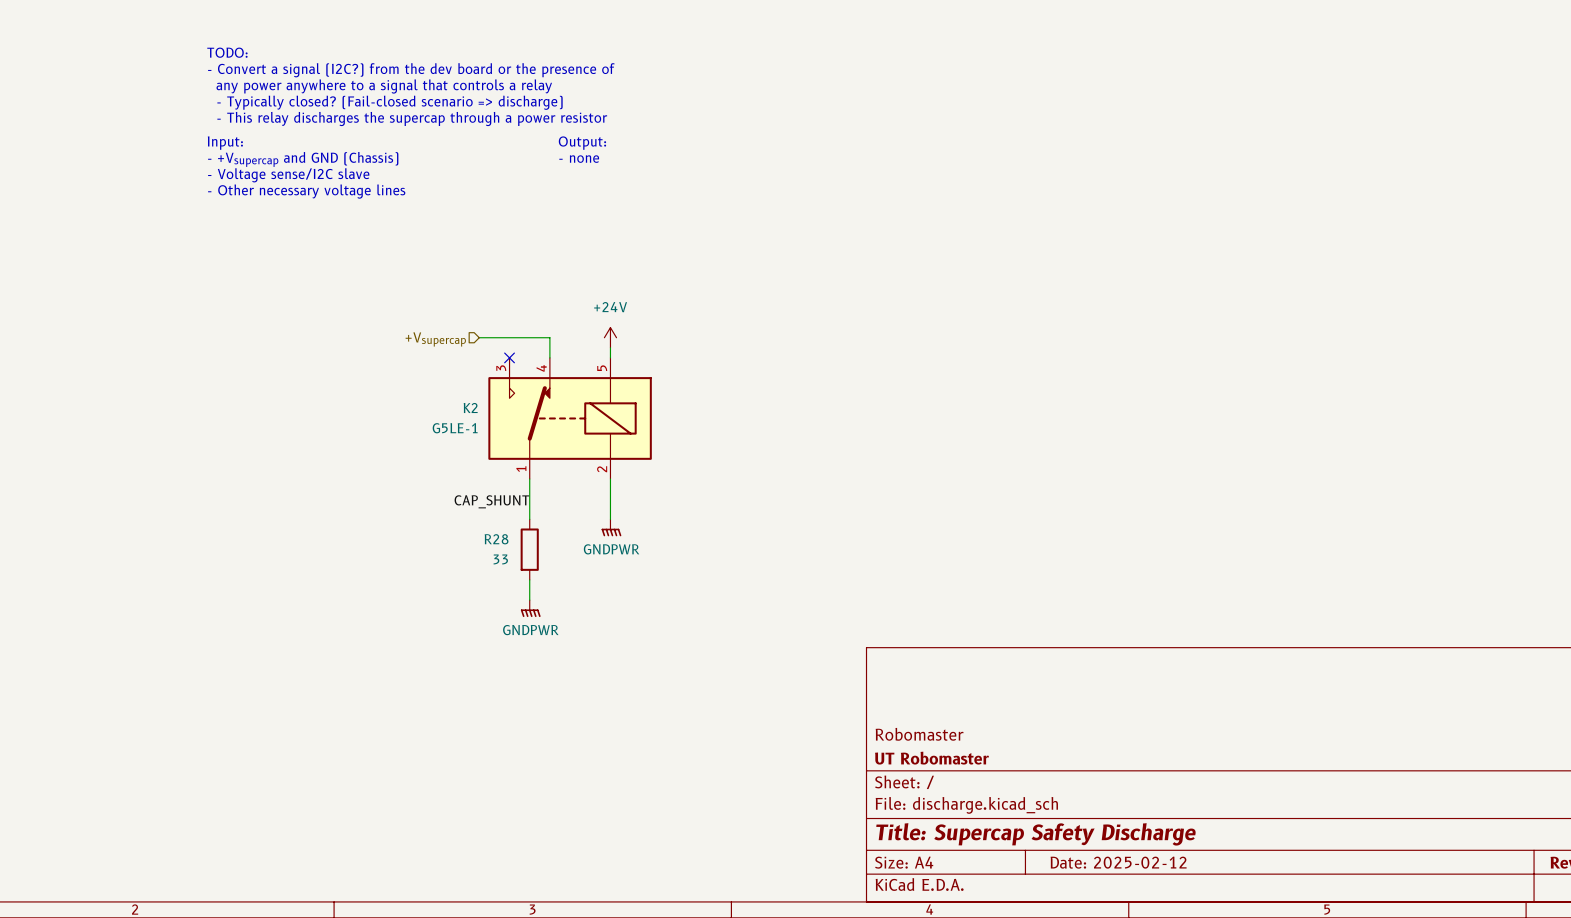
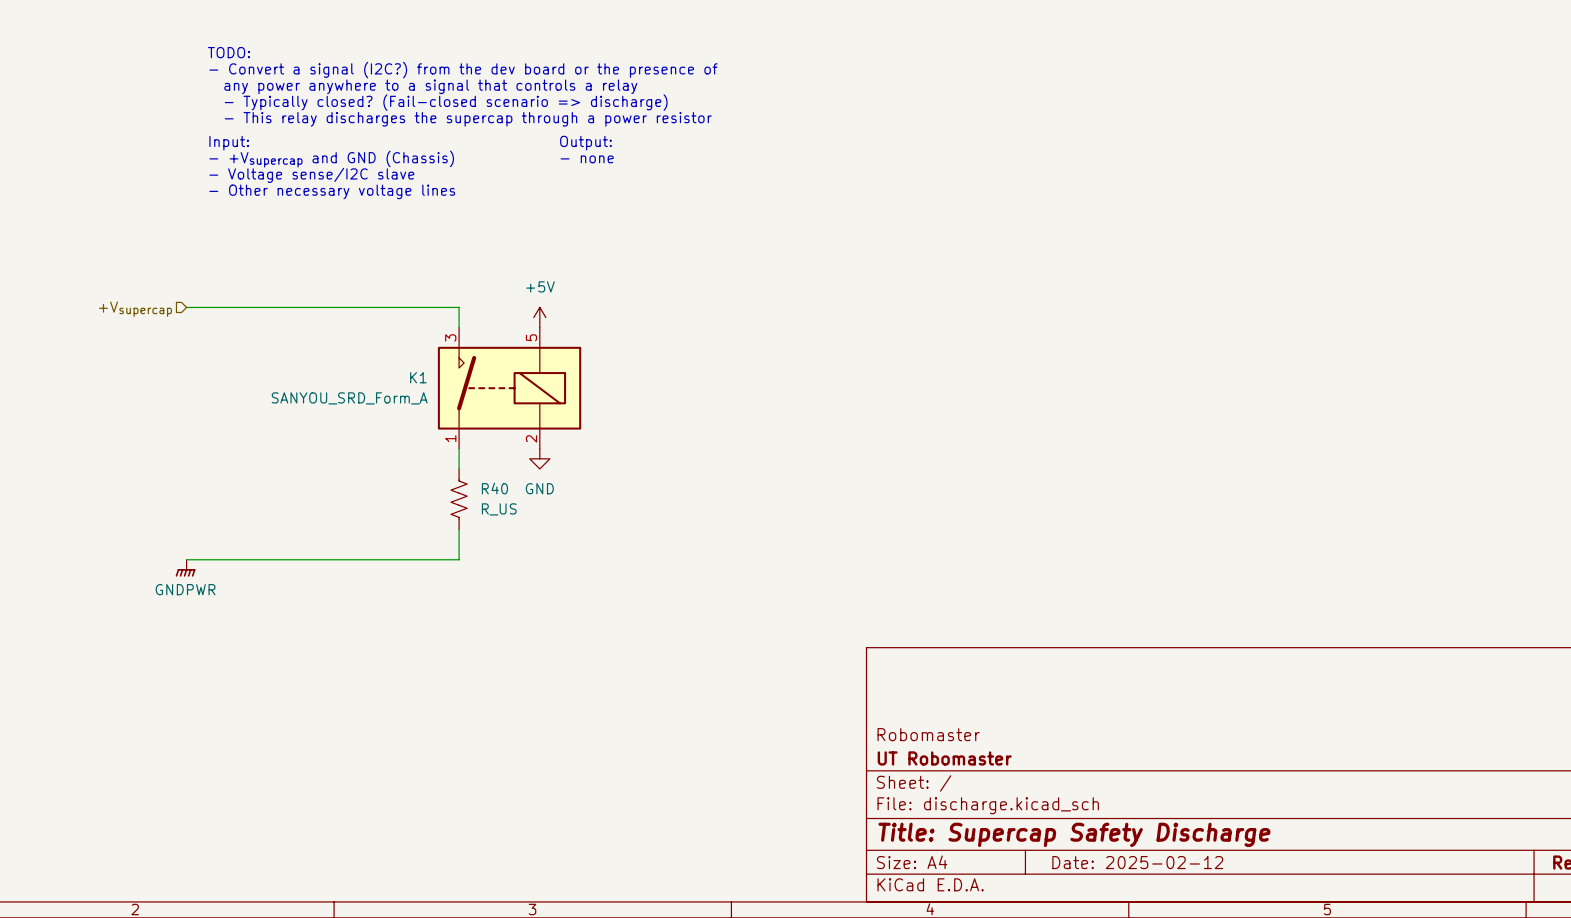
wire: none -> (186, 307) (459, 307) (459, 327)
hierarchical label: none -> +Vsupercap (135, 309)
power symbol: none -> +5V (539, 317)
wire: (479, 337) (549, 337) (549, 357) -> none
power symbol: +24V (610, 337) -> none
hierarchical label: +Vsupercap (435, 339) -> none
wire: (610, 347) (610, 357) -> none
no-connect mark: (509, 357) -> none
K1: none -> SANYOU_SRD_Form_A (509, 388)
K2: G5LE-1 (570, 418) -> none
power symbol: none -> GND (539, 458)
wire: (529, 479) (529, 519) -> none
wire: (610, 479) (610, 519) -> none
R40: none -> R_US (459, 499)
label: CAP_SHUNT (491, 501) -> none
power symbol: GNDPWR (611, 527) -> none
wire: none -> (459, 529) (459, 559) (186, 559)
R28: 33 (529, 549) -> none
power symbol: none -> GNDPWR (185, 568)
wire: (529, 579) (529, 600) -> (459, 448) (459, 468)
power symbol: GNDPWR (530, 608) -> none

